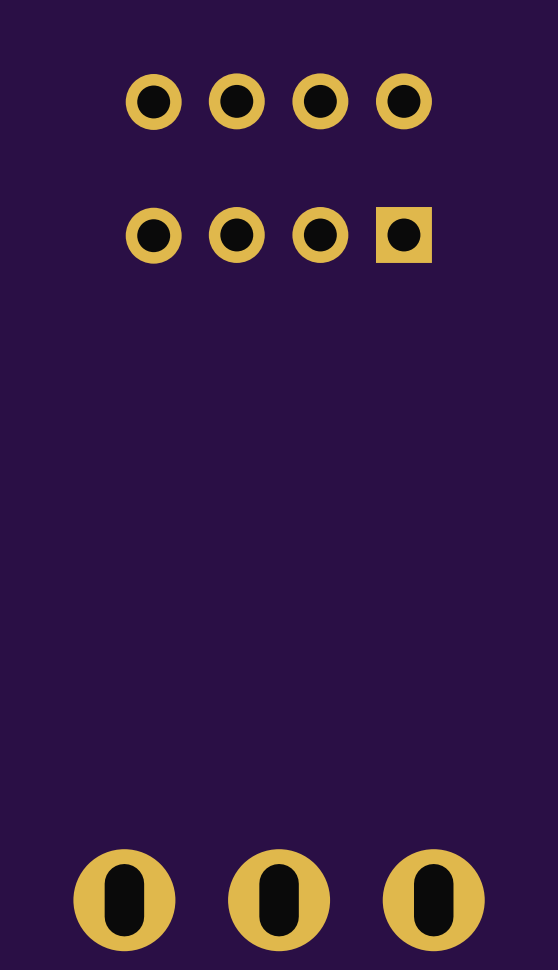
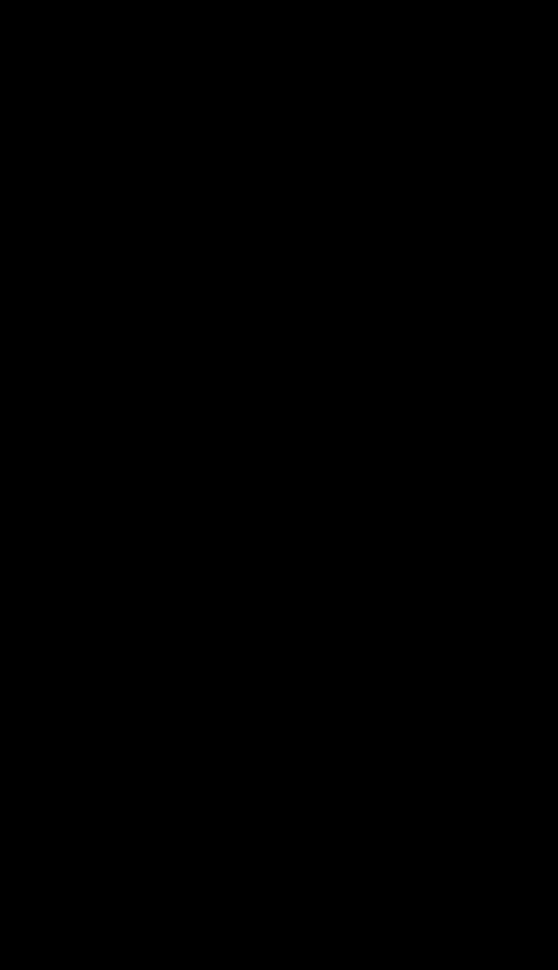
part: (278, 168) -> none
part: (279, 900) -> none

